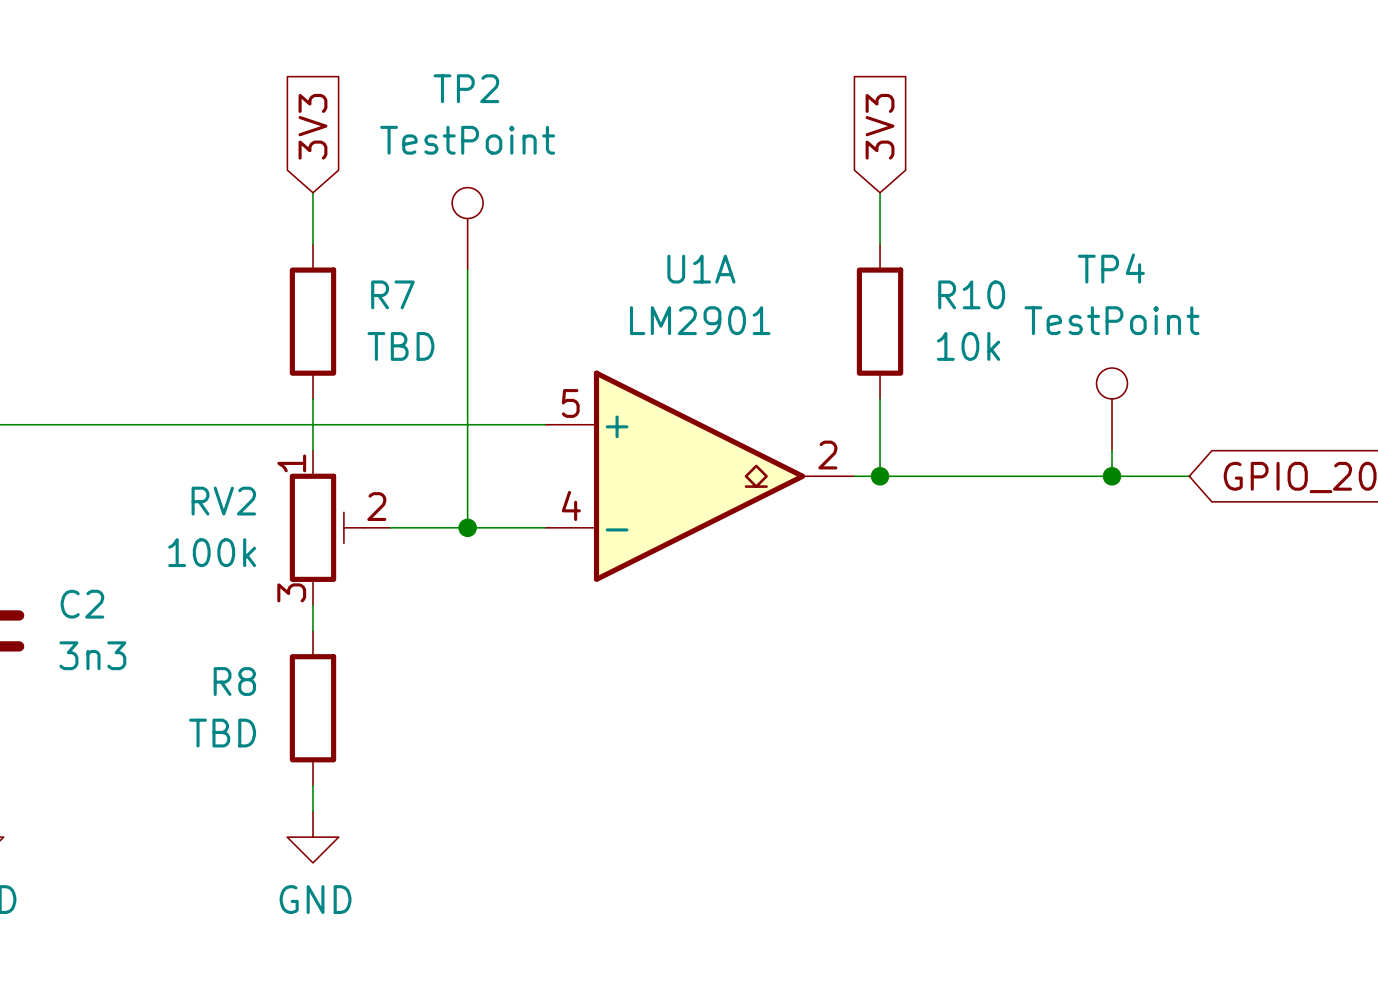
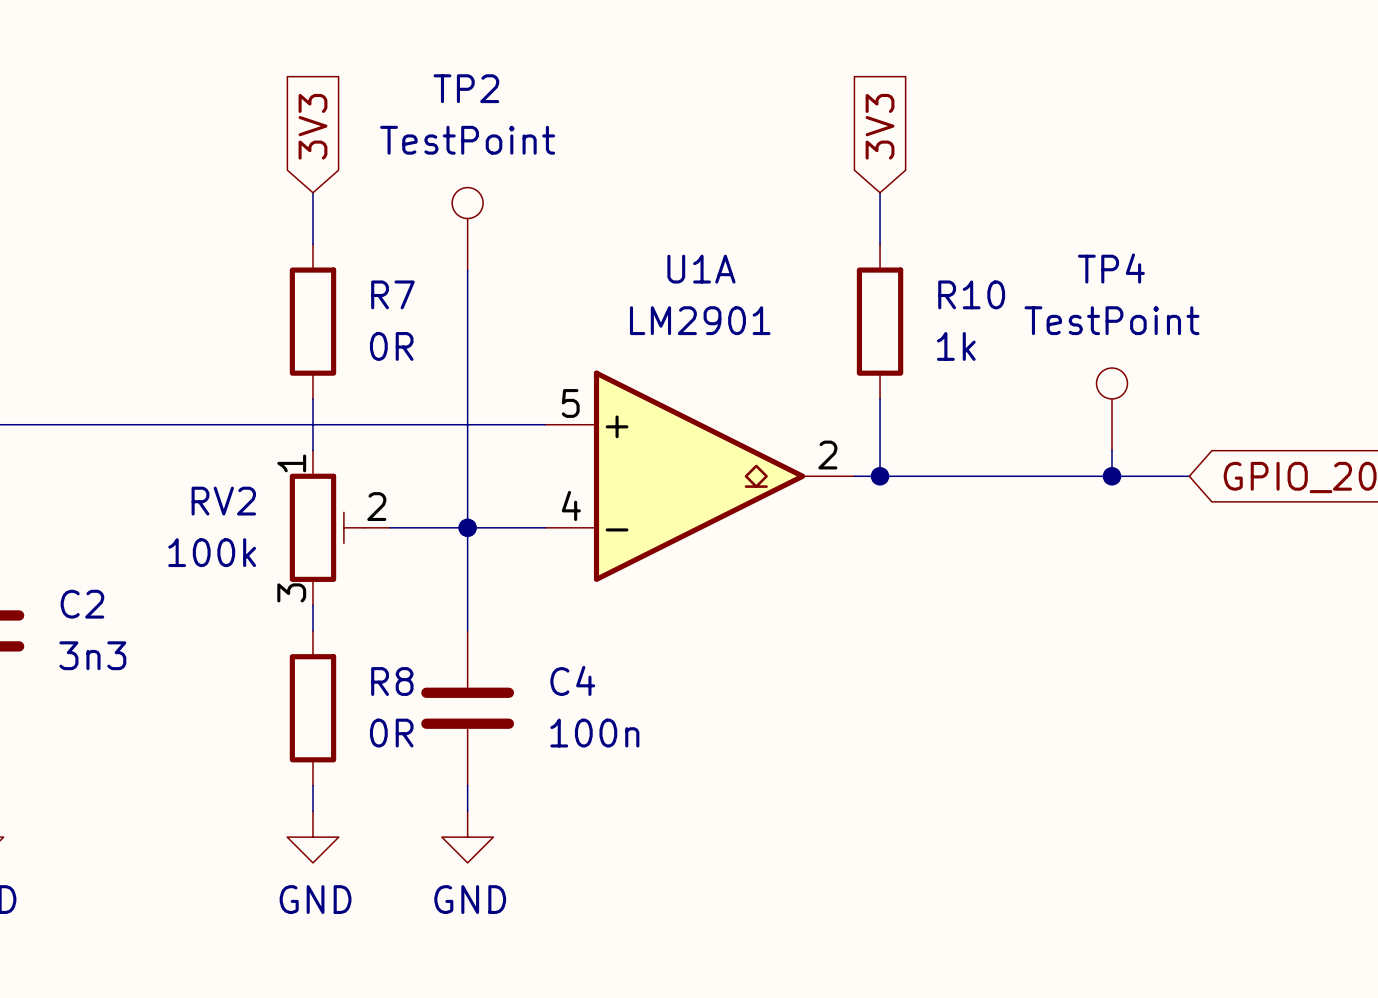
R7 value: TBD (400, 346) -> 0R (391, 346)
R10 value: 10k (968, 346) -> 1k (956, 346)
wire: none -> (467, 527) (467, 630)
R8 name position: R8 (234, 681) -> R8 (392, 681)
C4: none -> 100n (467, 708)
R8 value: TBD (222, 733) -> 0R (391, 733)
wire: none -> (467, 785) (467, 811)
power symbol: none -> GND (467, 837)

